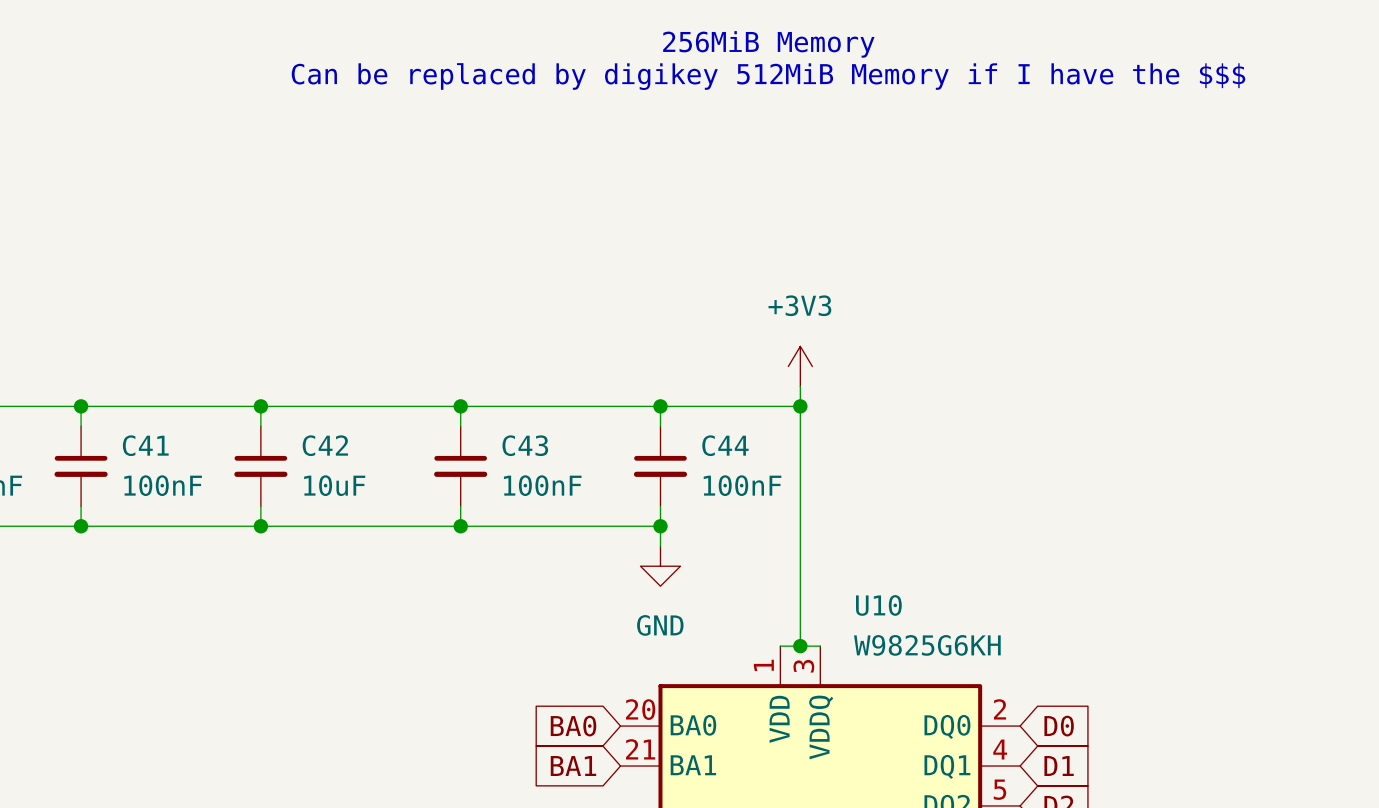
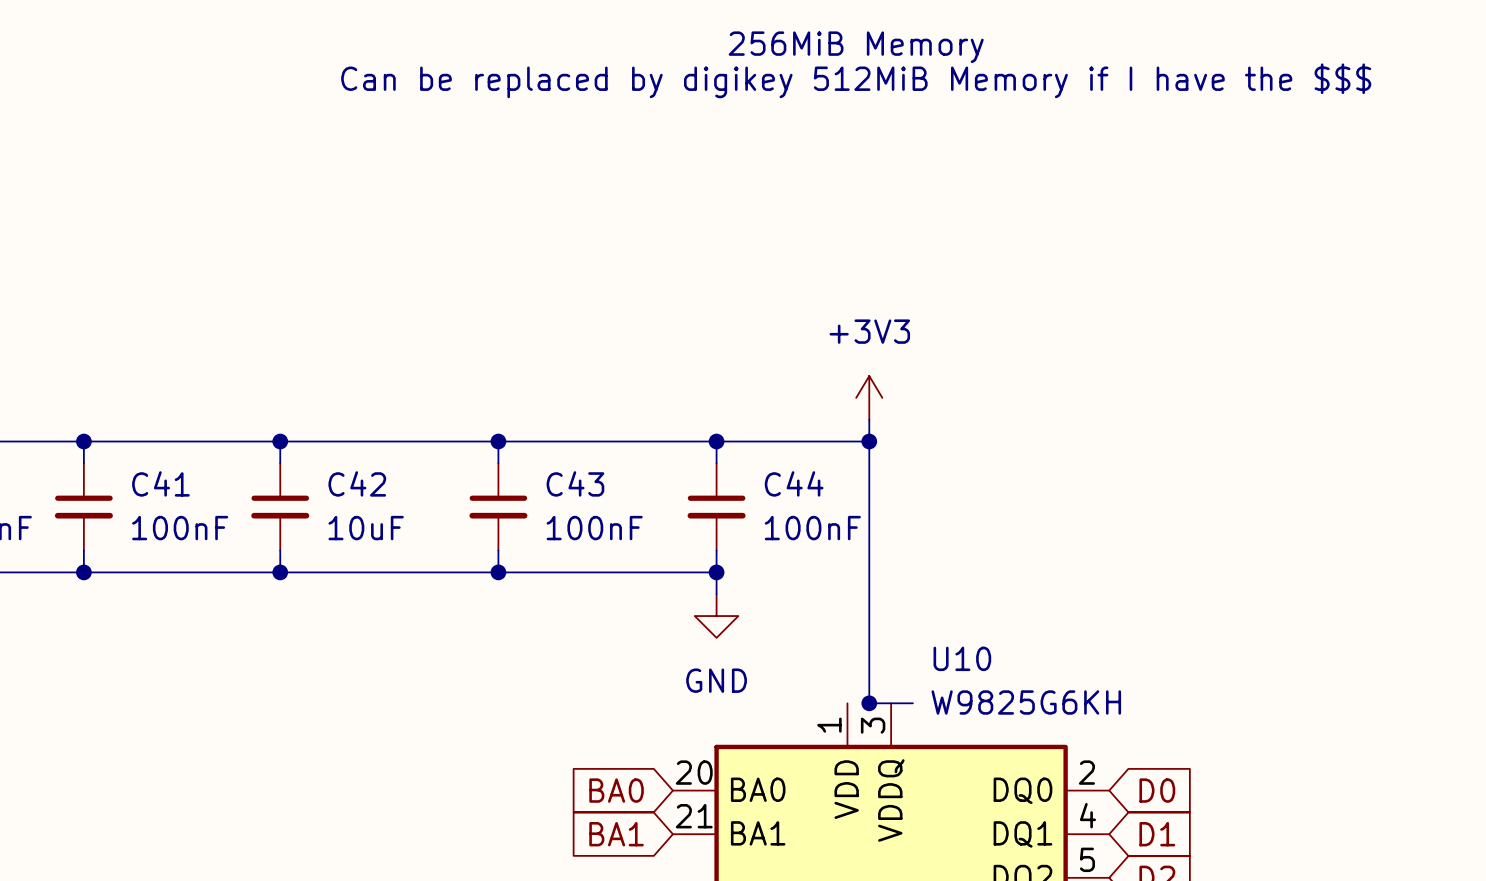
text position: 256MiB Memory (768, 44) -> 256MiB Memory (856, 47)
text position: Can be replaced by digikey 512MiB Memory if I have the $$$ (768, 76) -> Can be replaced by digikey 512MiB Memory if I have the $$$ (856, 80)
wire: (780, 646) (800, 646) -> (891, 703) (912, 703)

